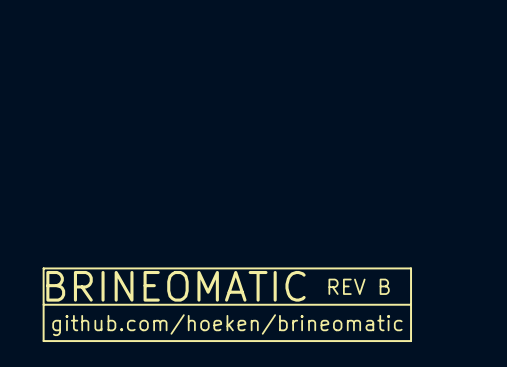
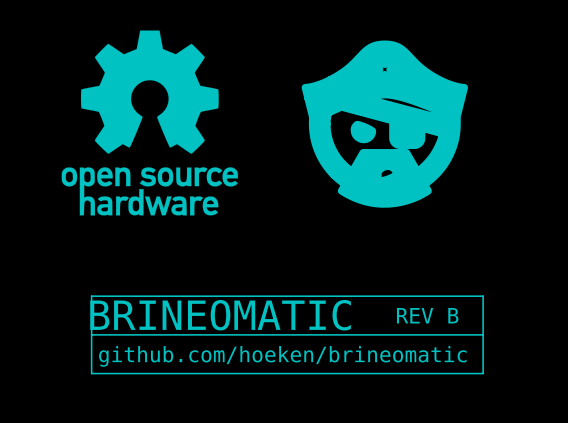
drawing: none -> [61, 30, 238, 216]
drawing: none -> [301, 40, 469, 208]

